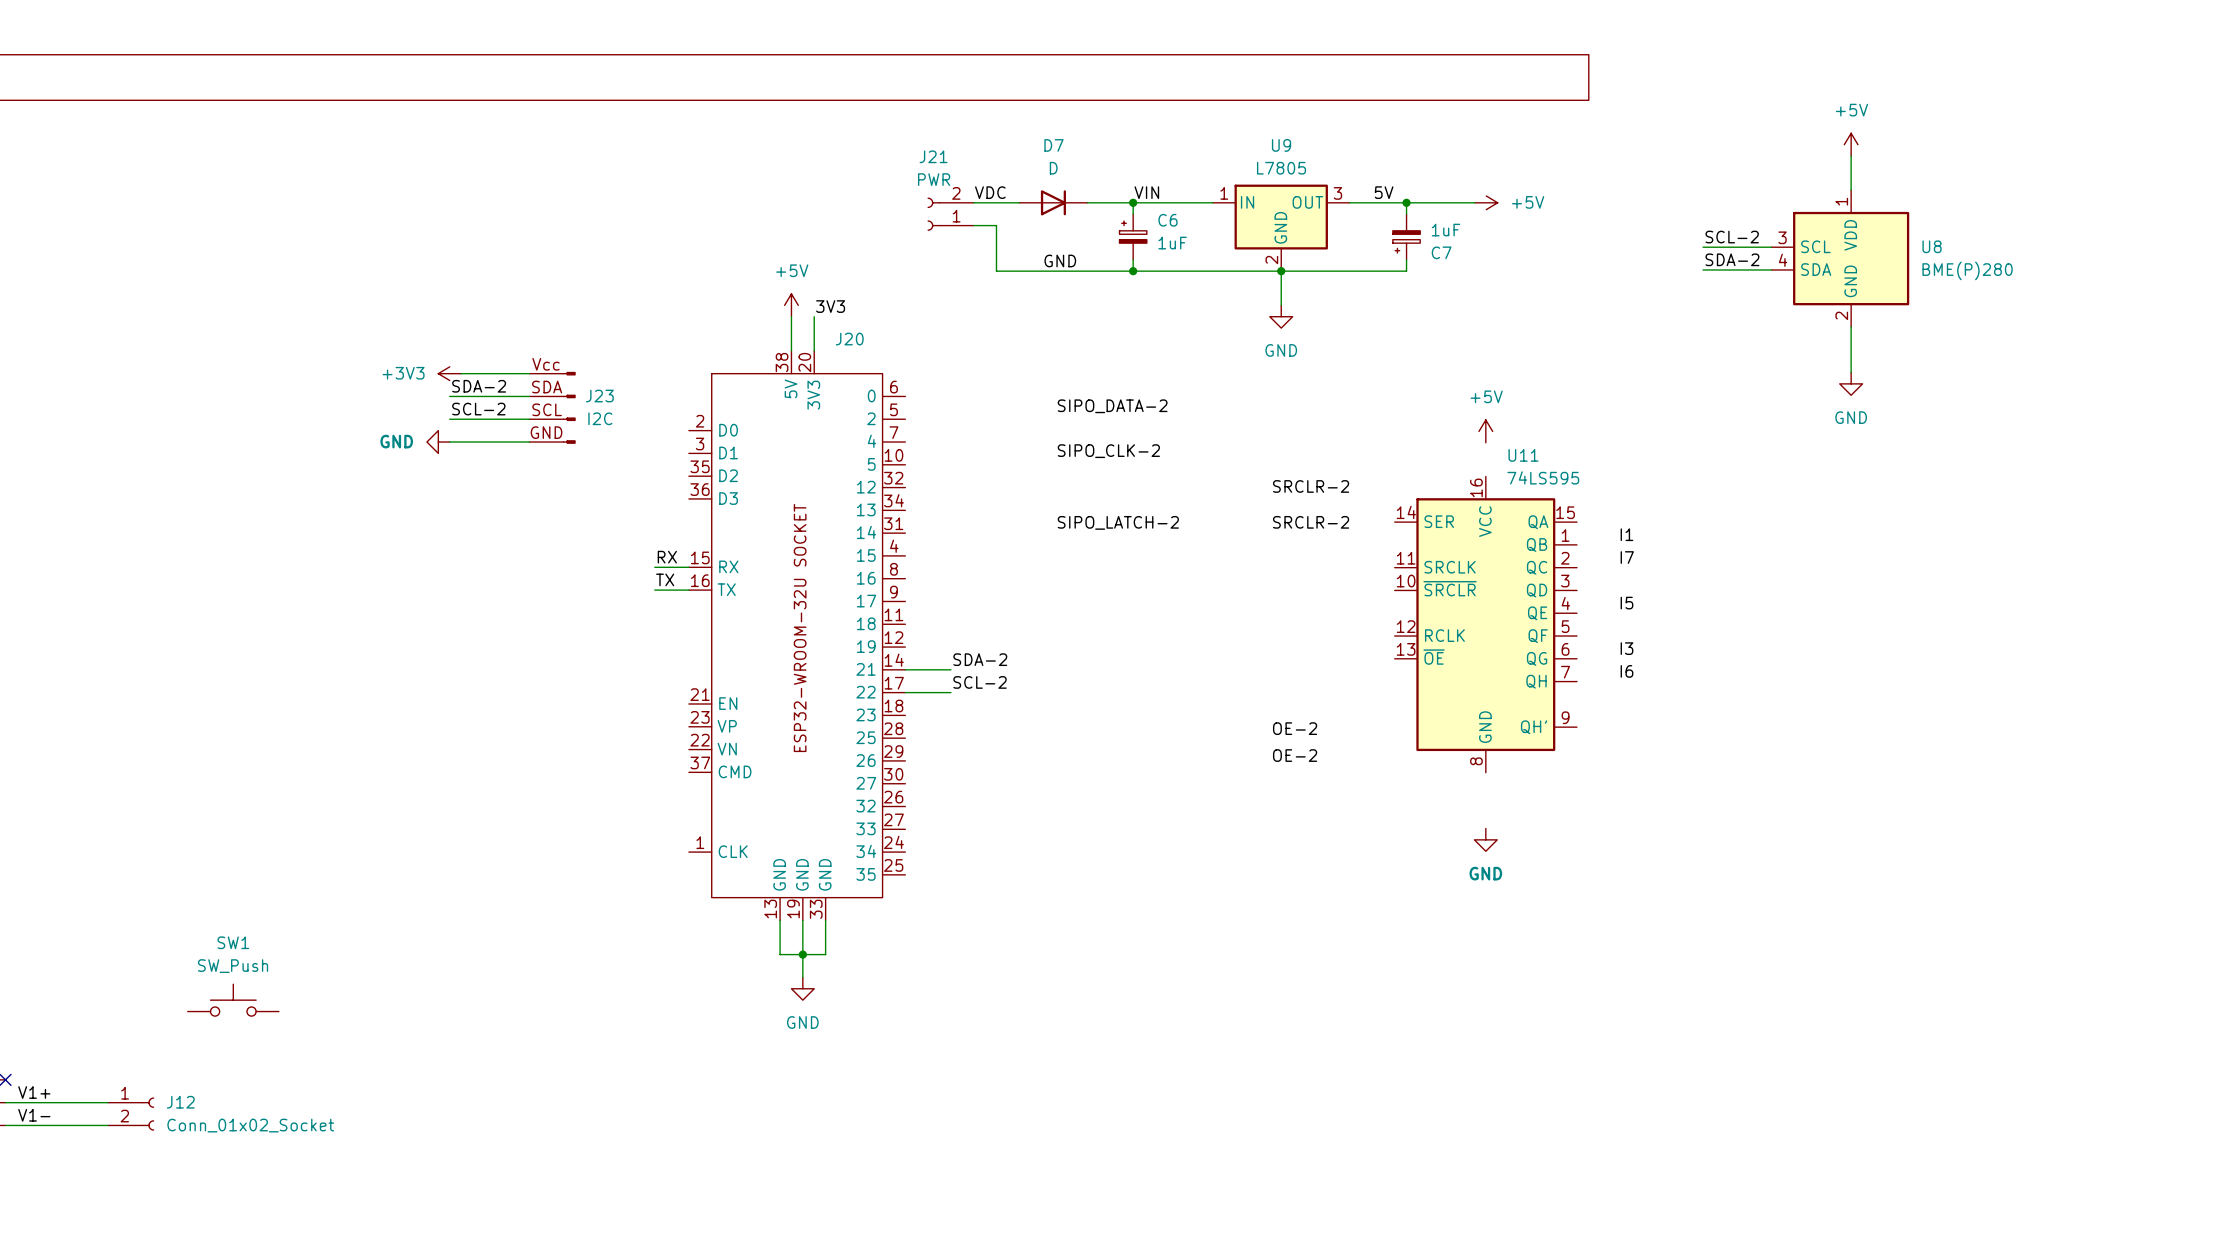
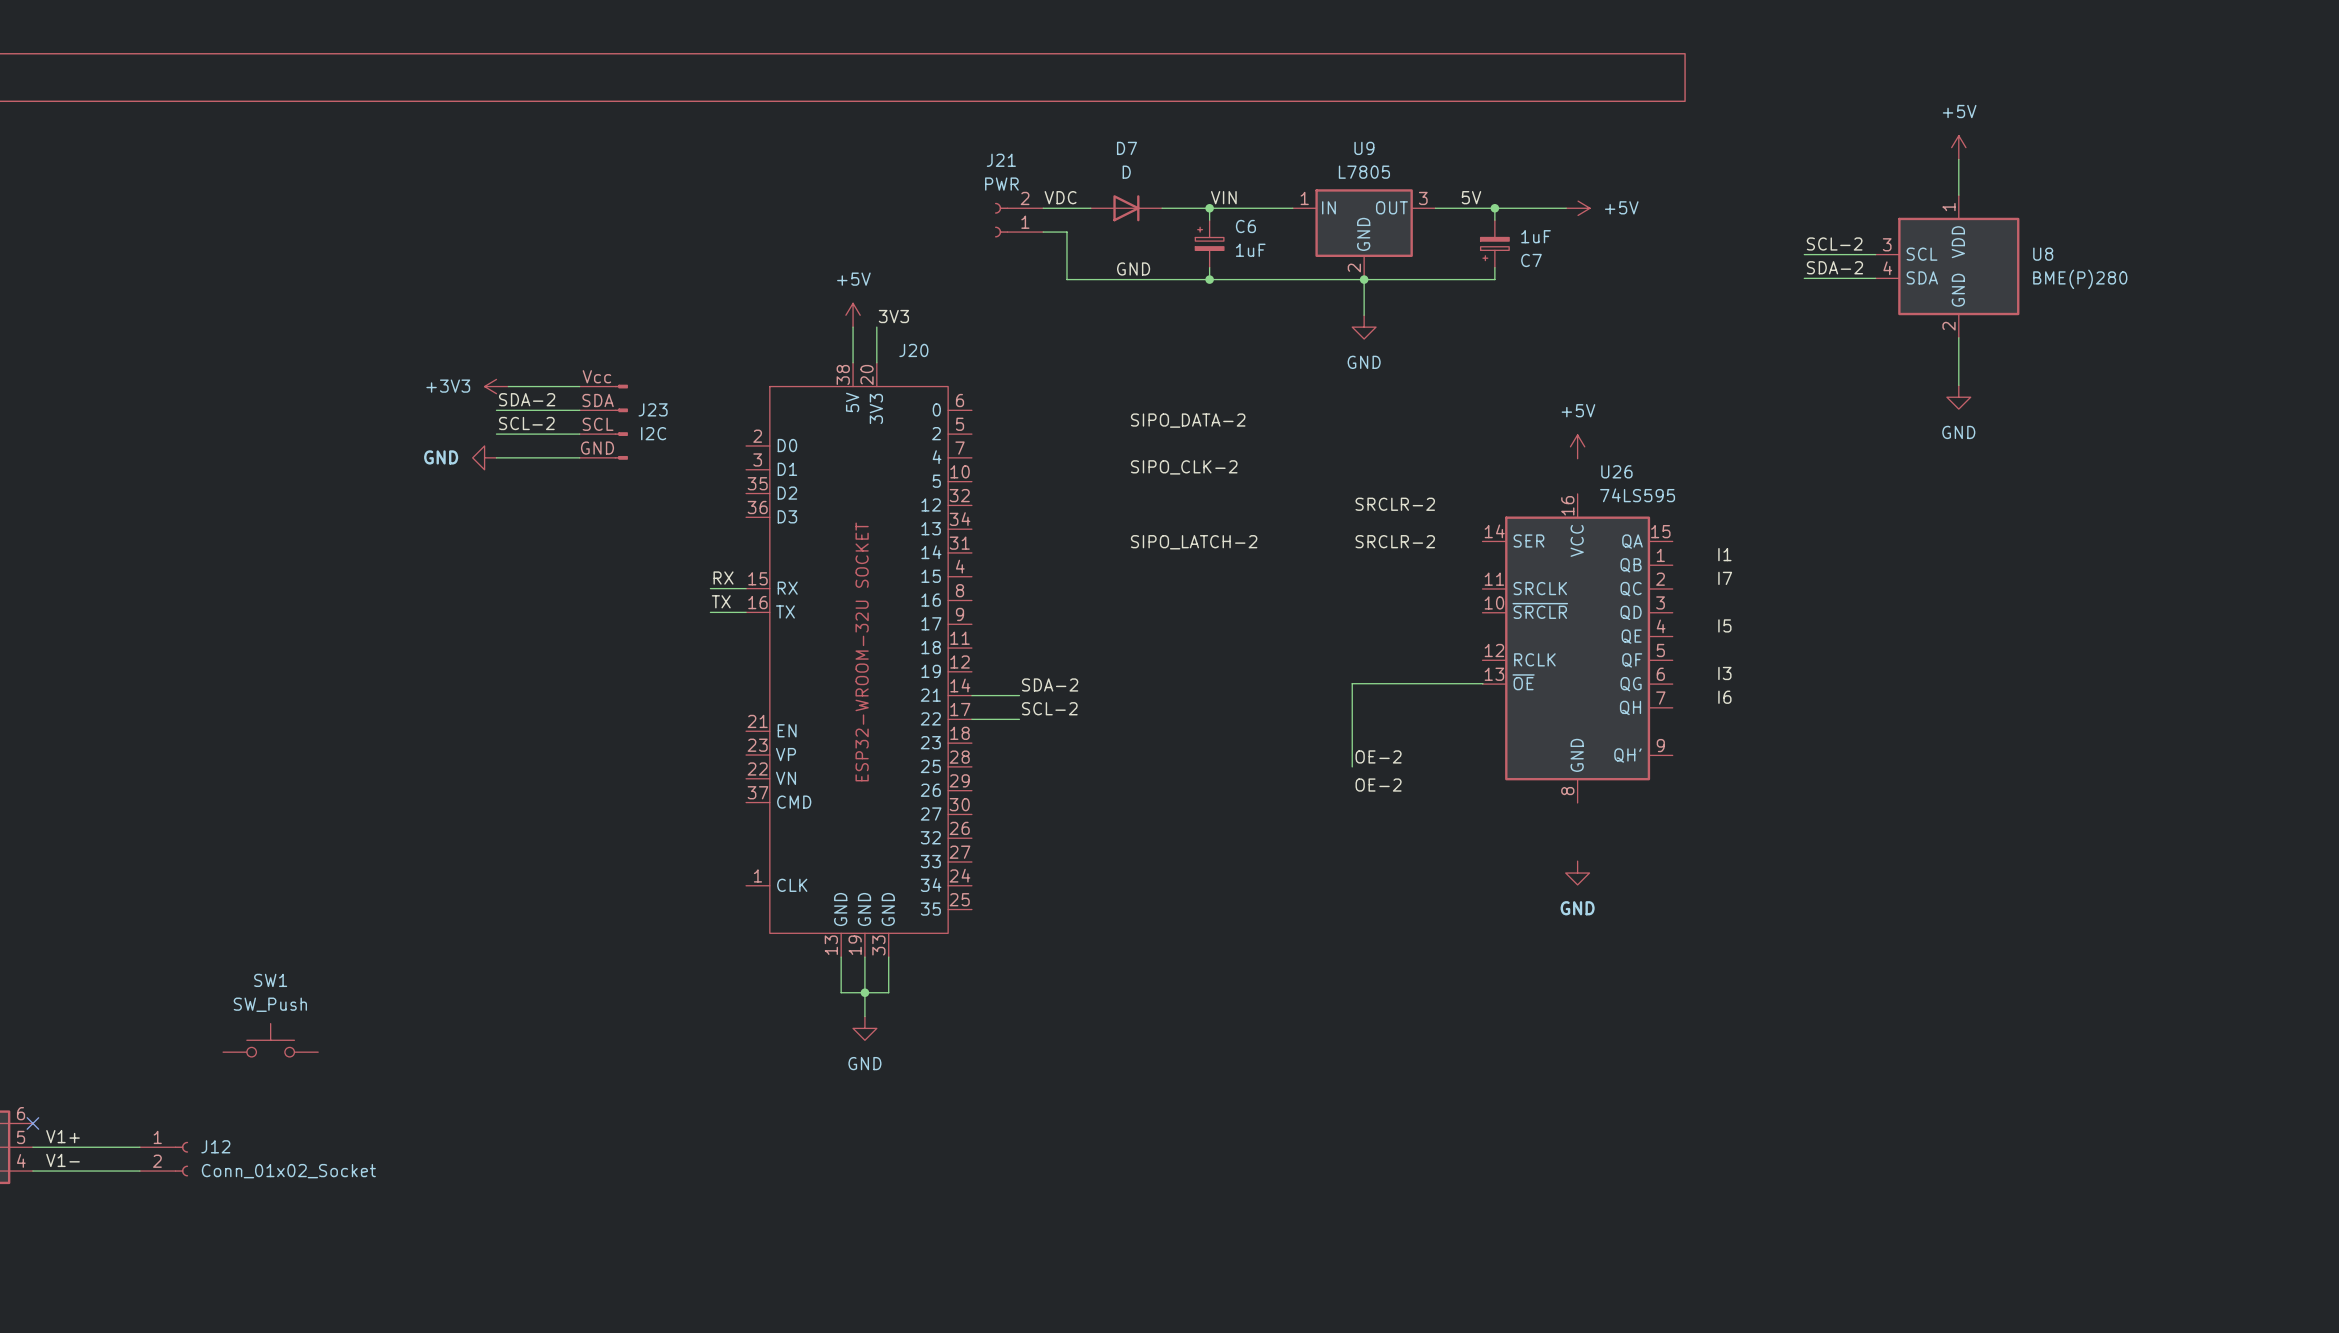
U11 name: U11 (1523, 455) -> U26 (1616, 471)
wire: none -> (1482, 683) (1352, 683) (1352, 766)

